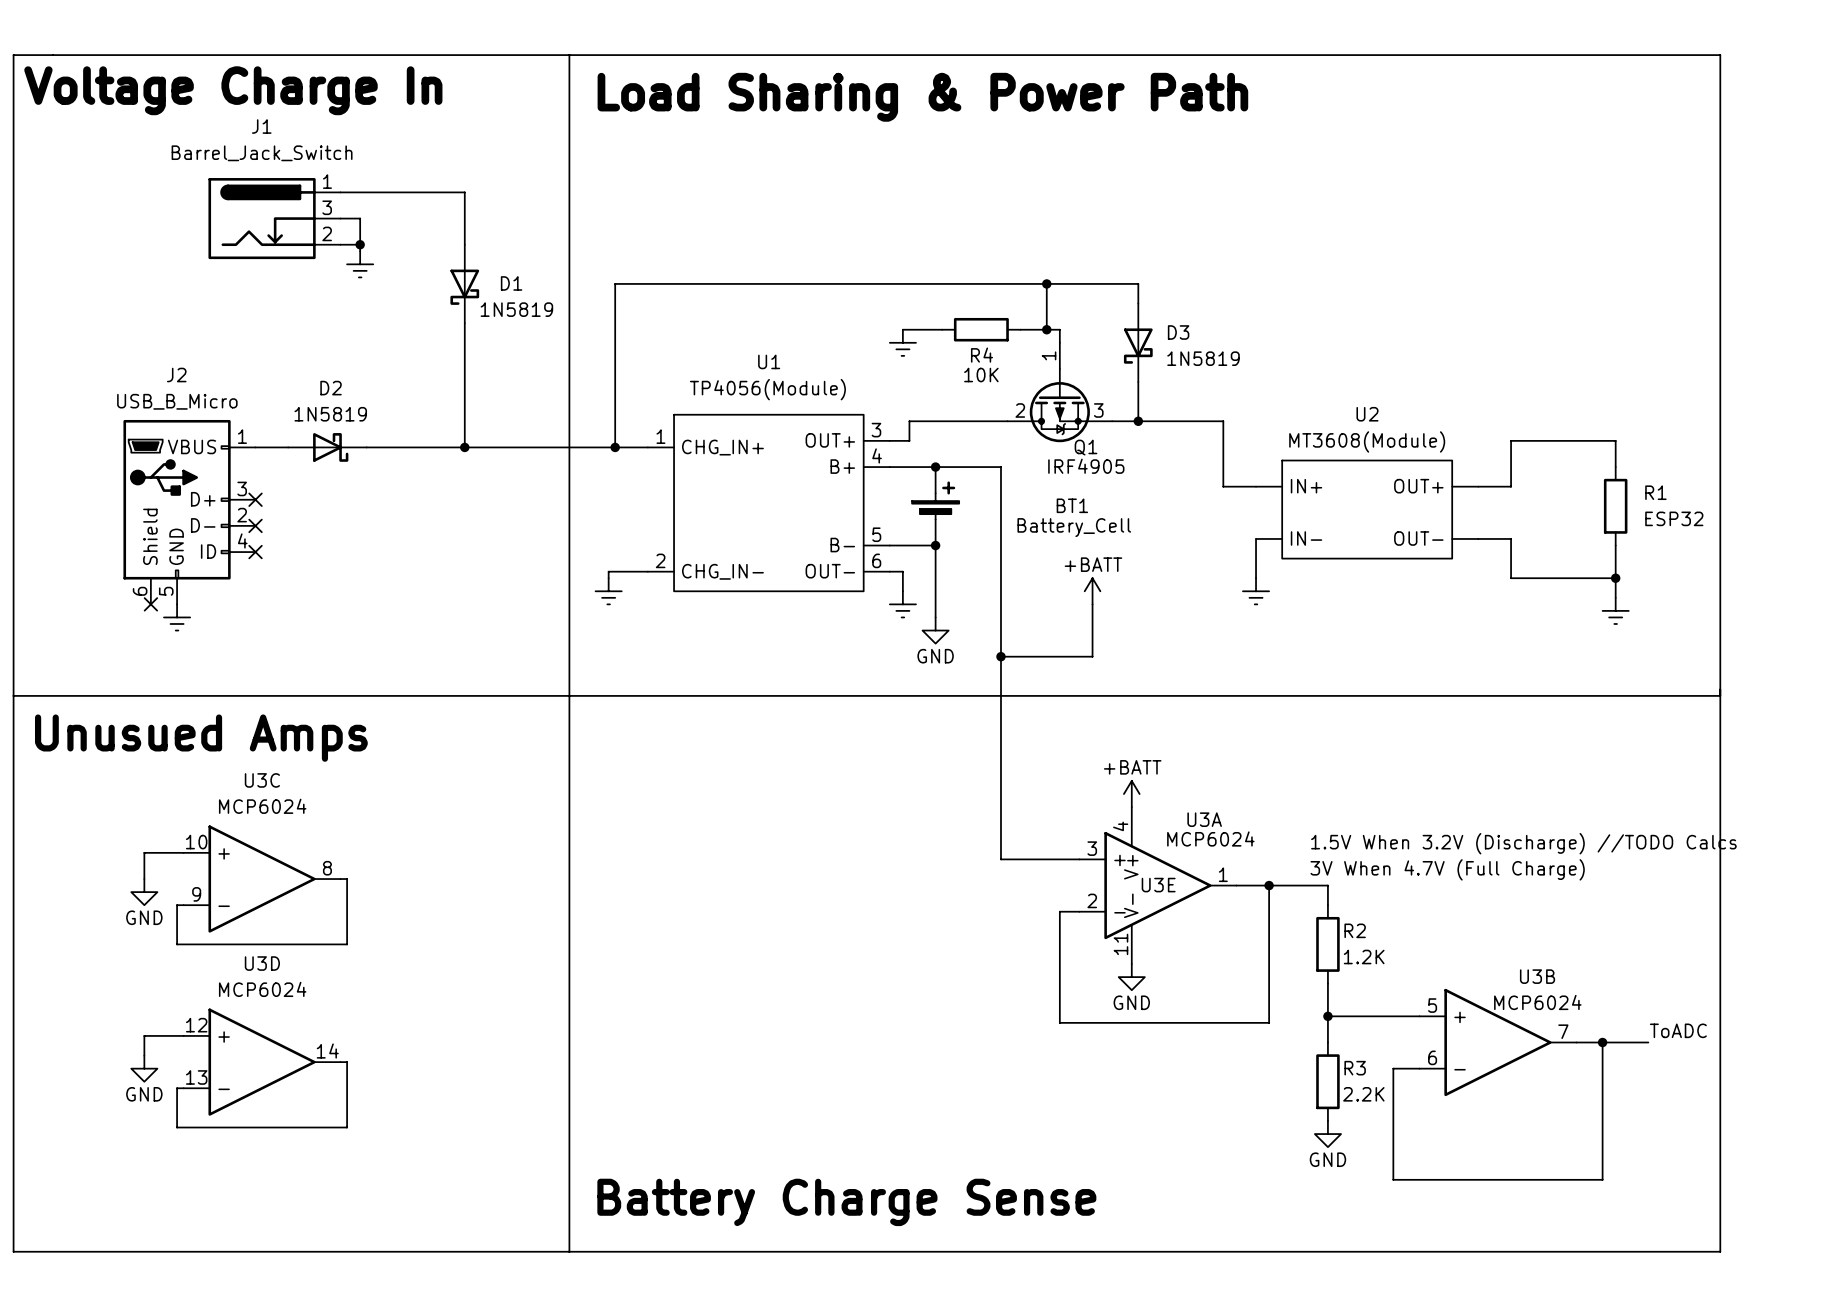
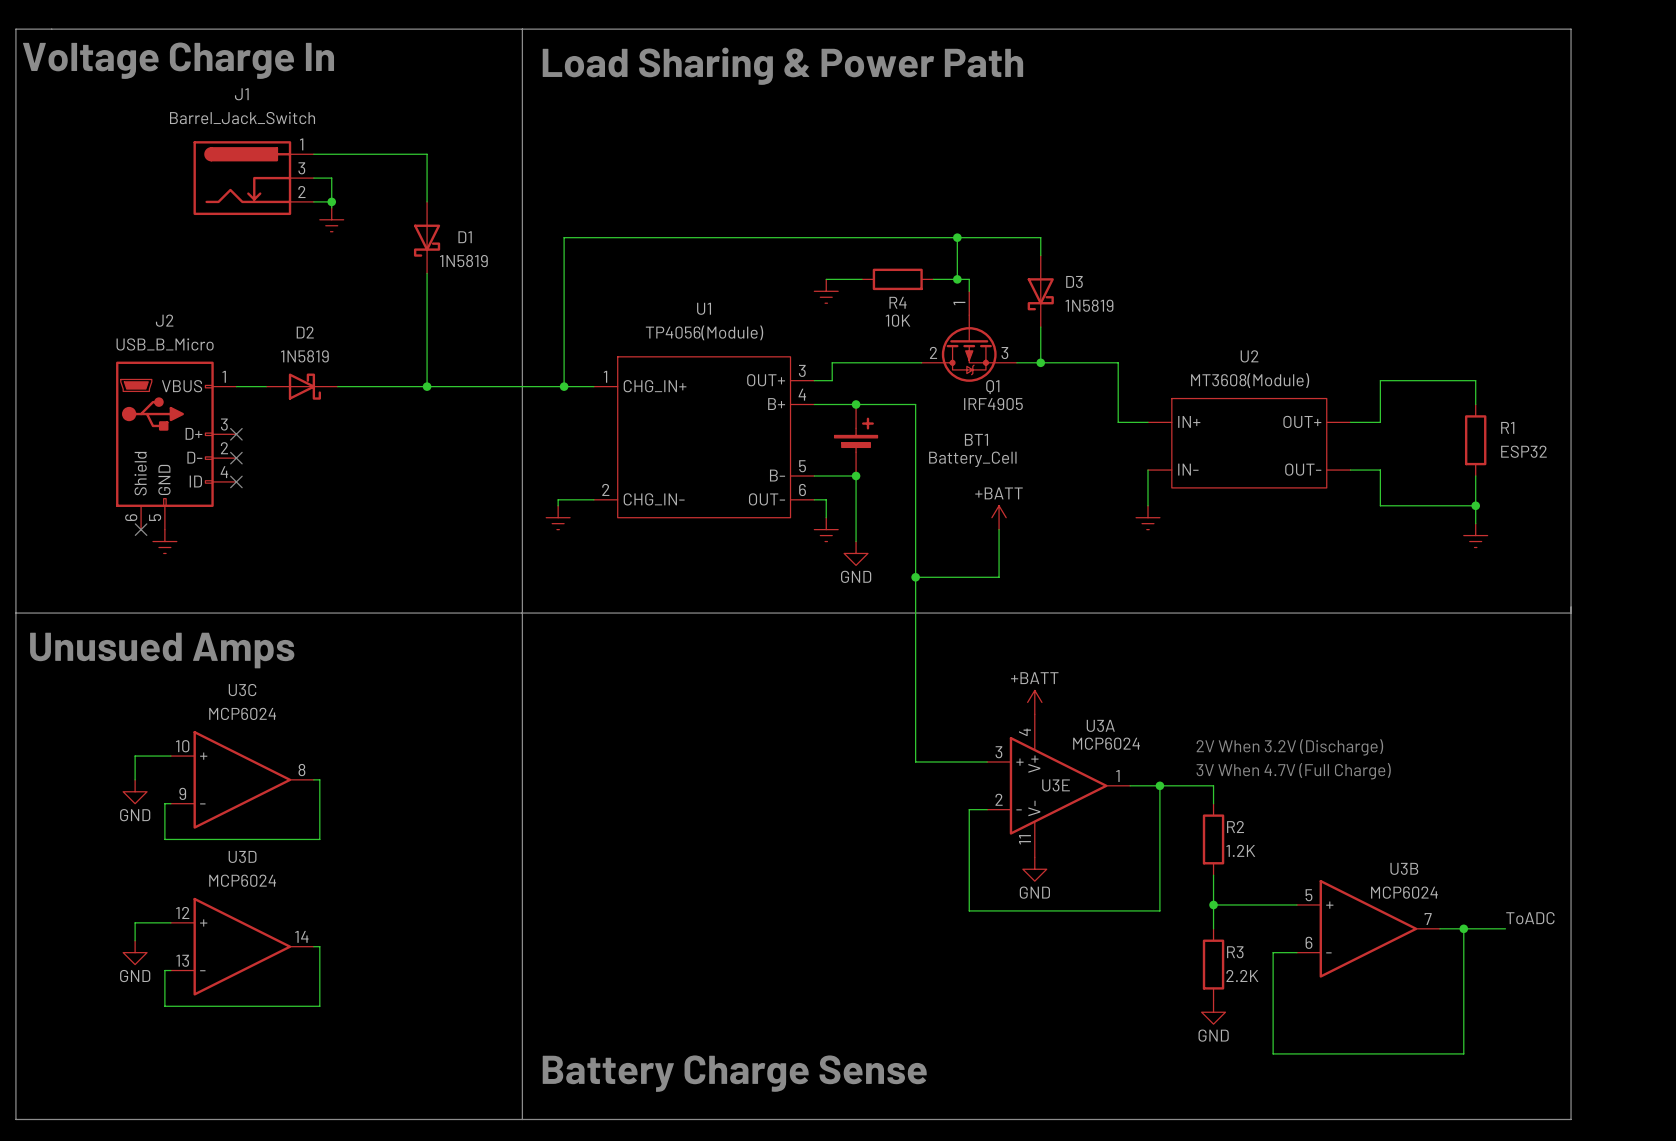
text: 1.5V When 3.2V (Discharge) //TODO Calcs (1523, 843) -> 2V When 3.2V (Discharge) (1289, 747)

